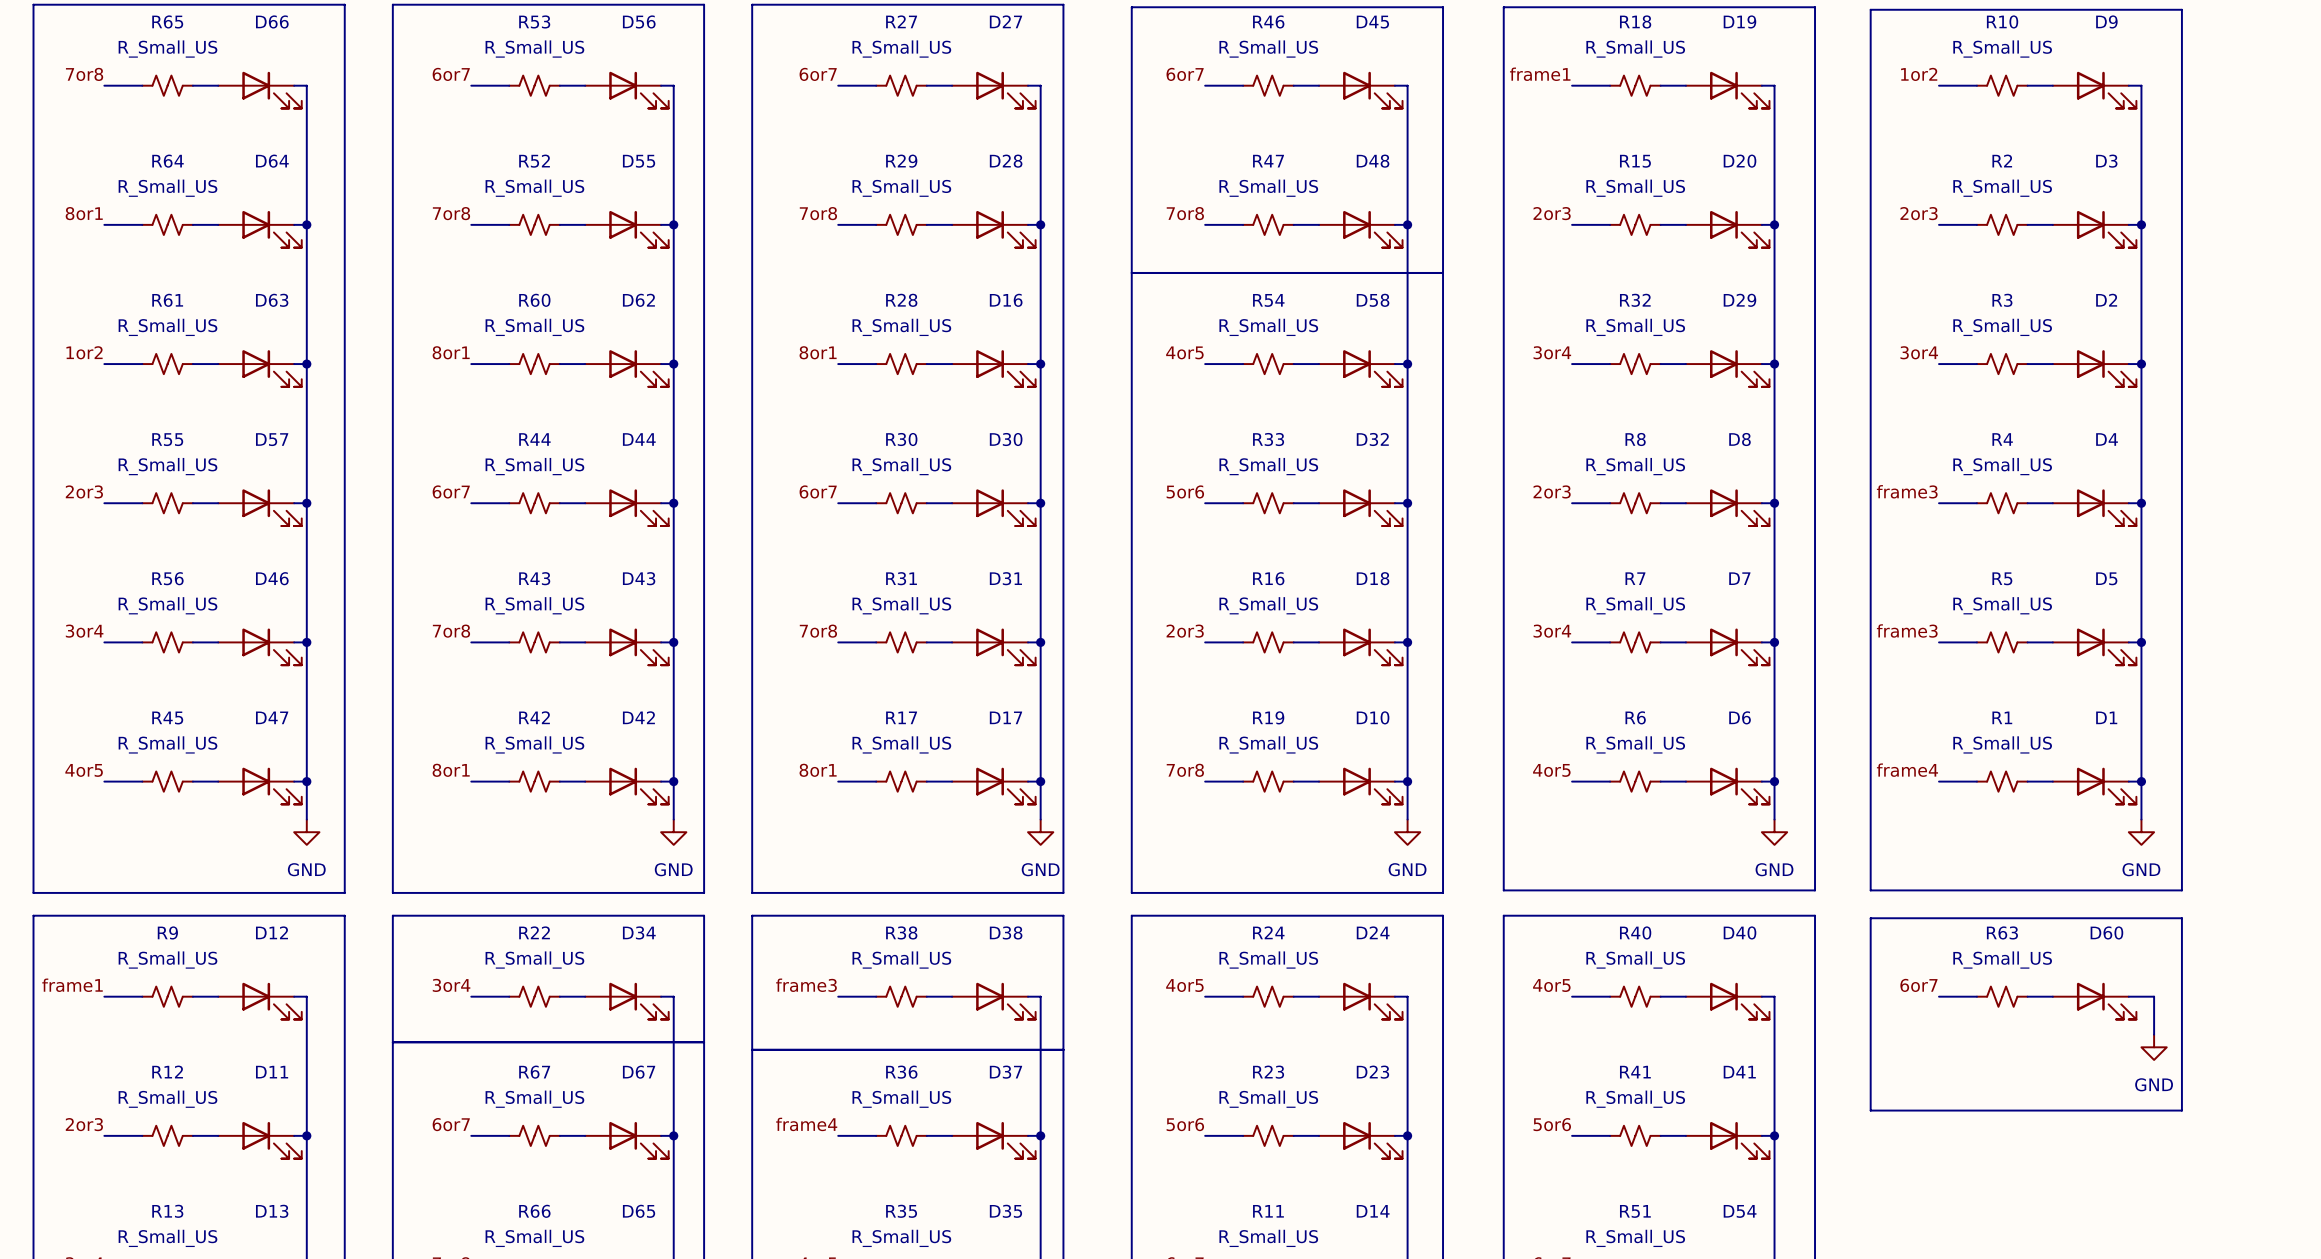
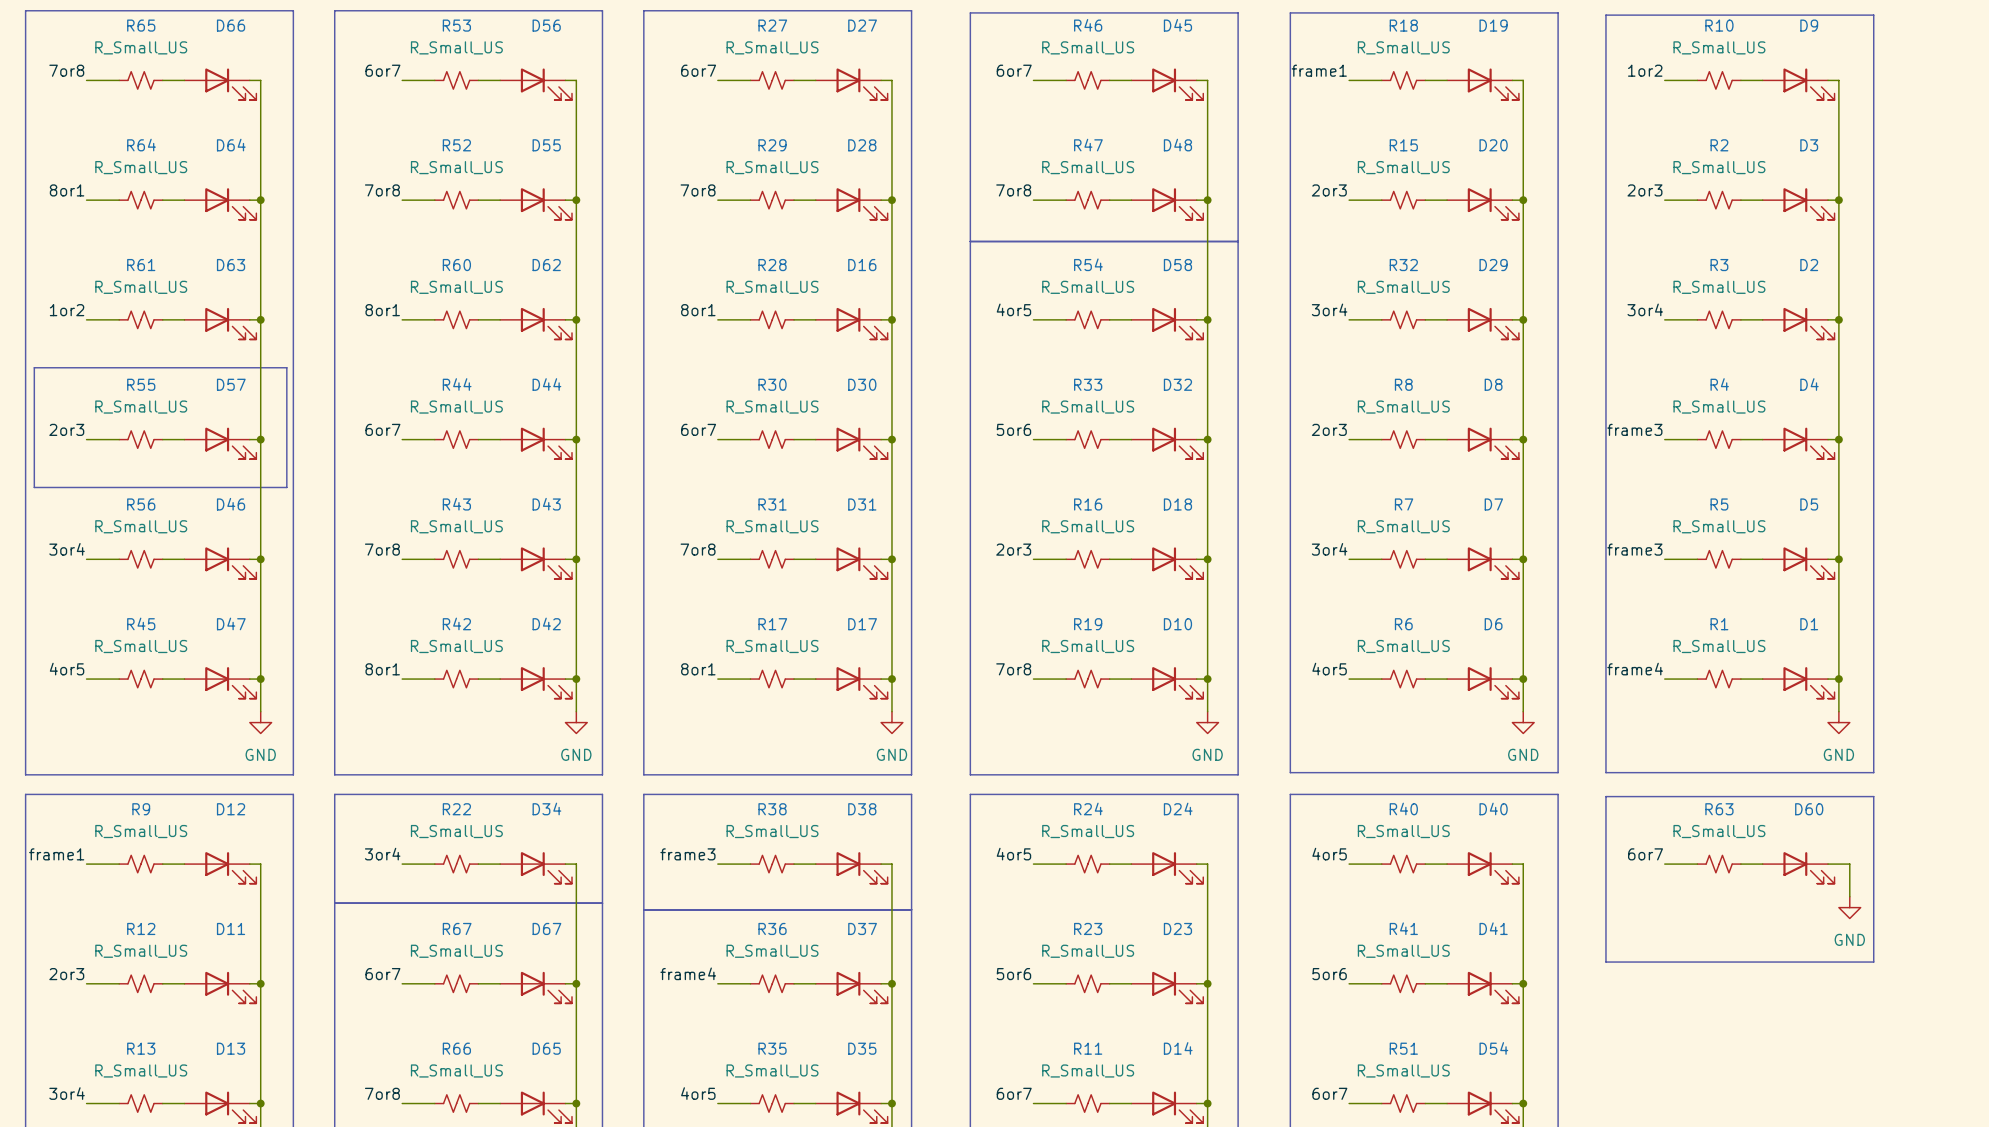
line: none -> (34, 367) (286, 367) (286, 487) (34, 487) (34, 367)

